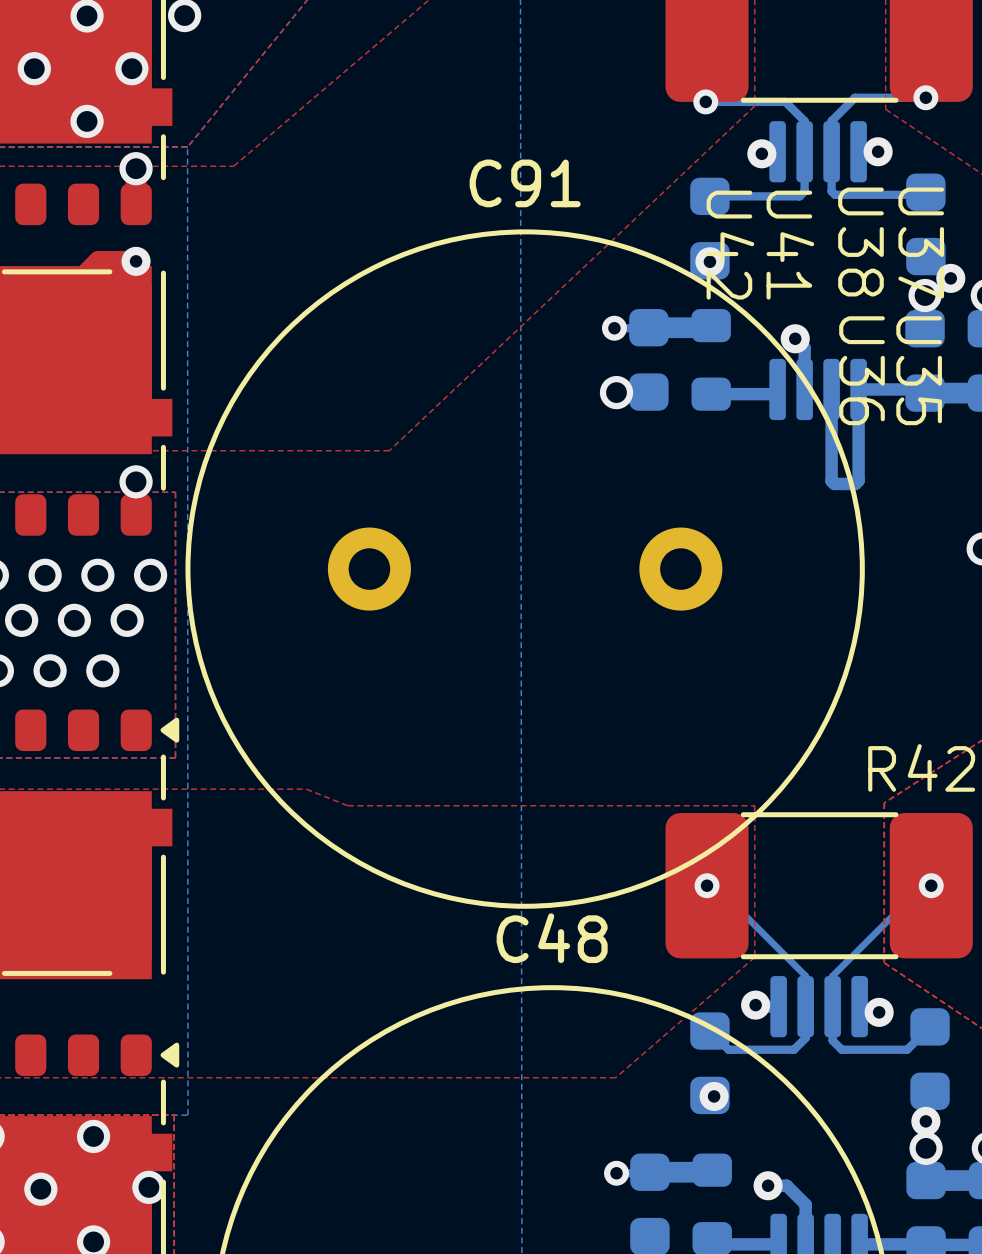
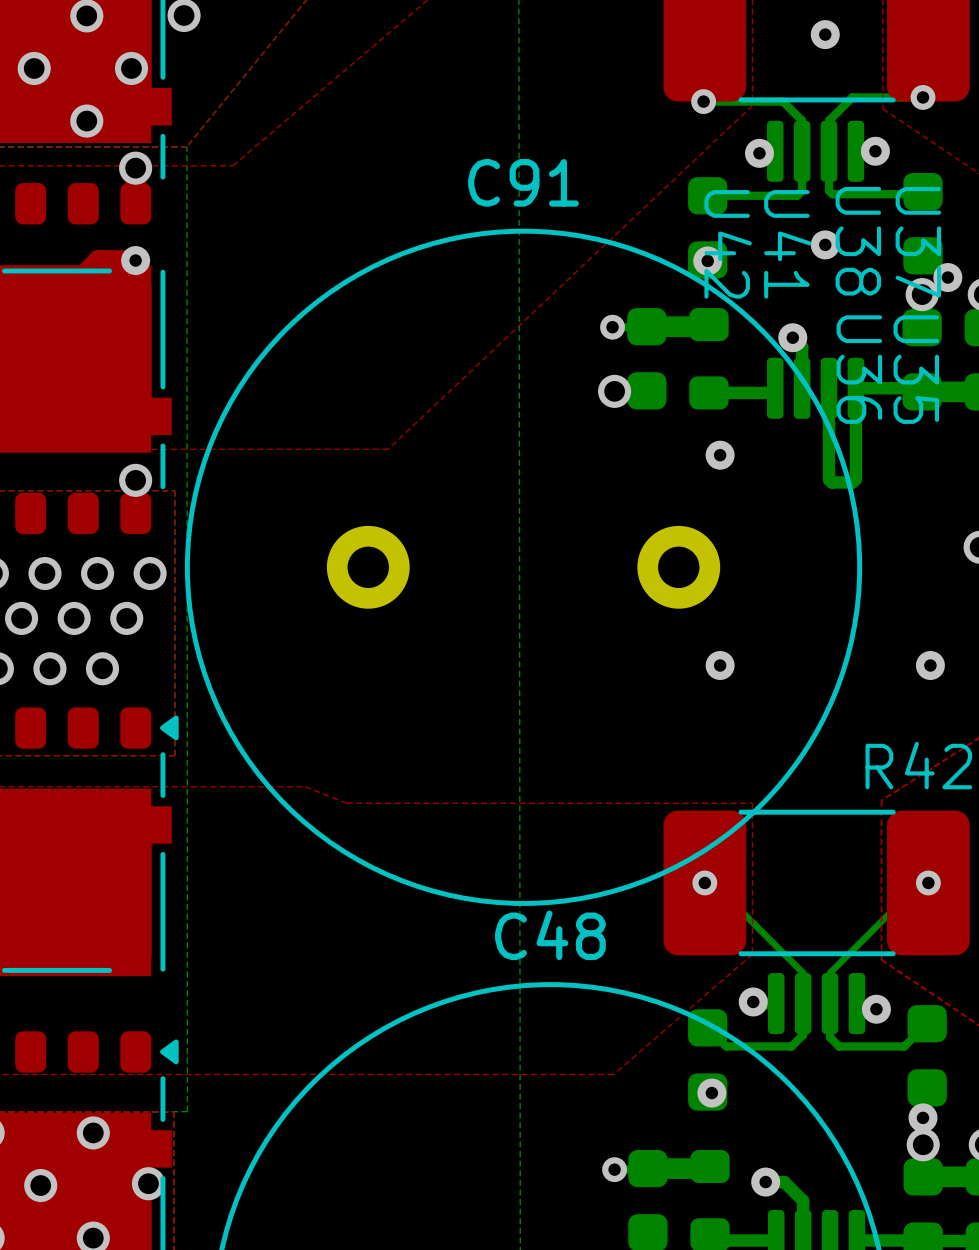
via: none -> (825, 34)
via: none -> (825, 244)
via: none -> (720, 455)
via: none -> (720, 665)
via: none -> (930, 665)

